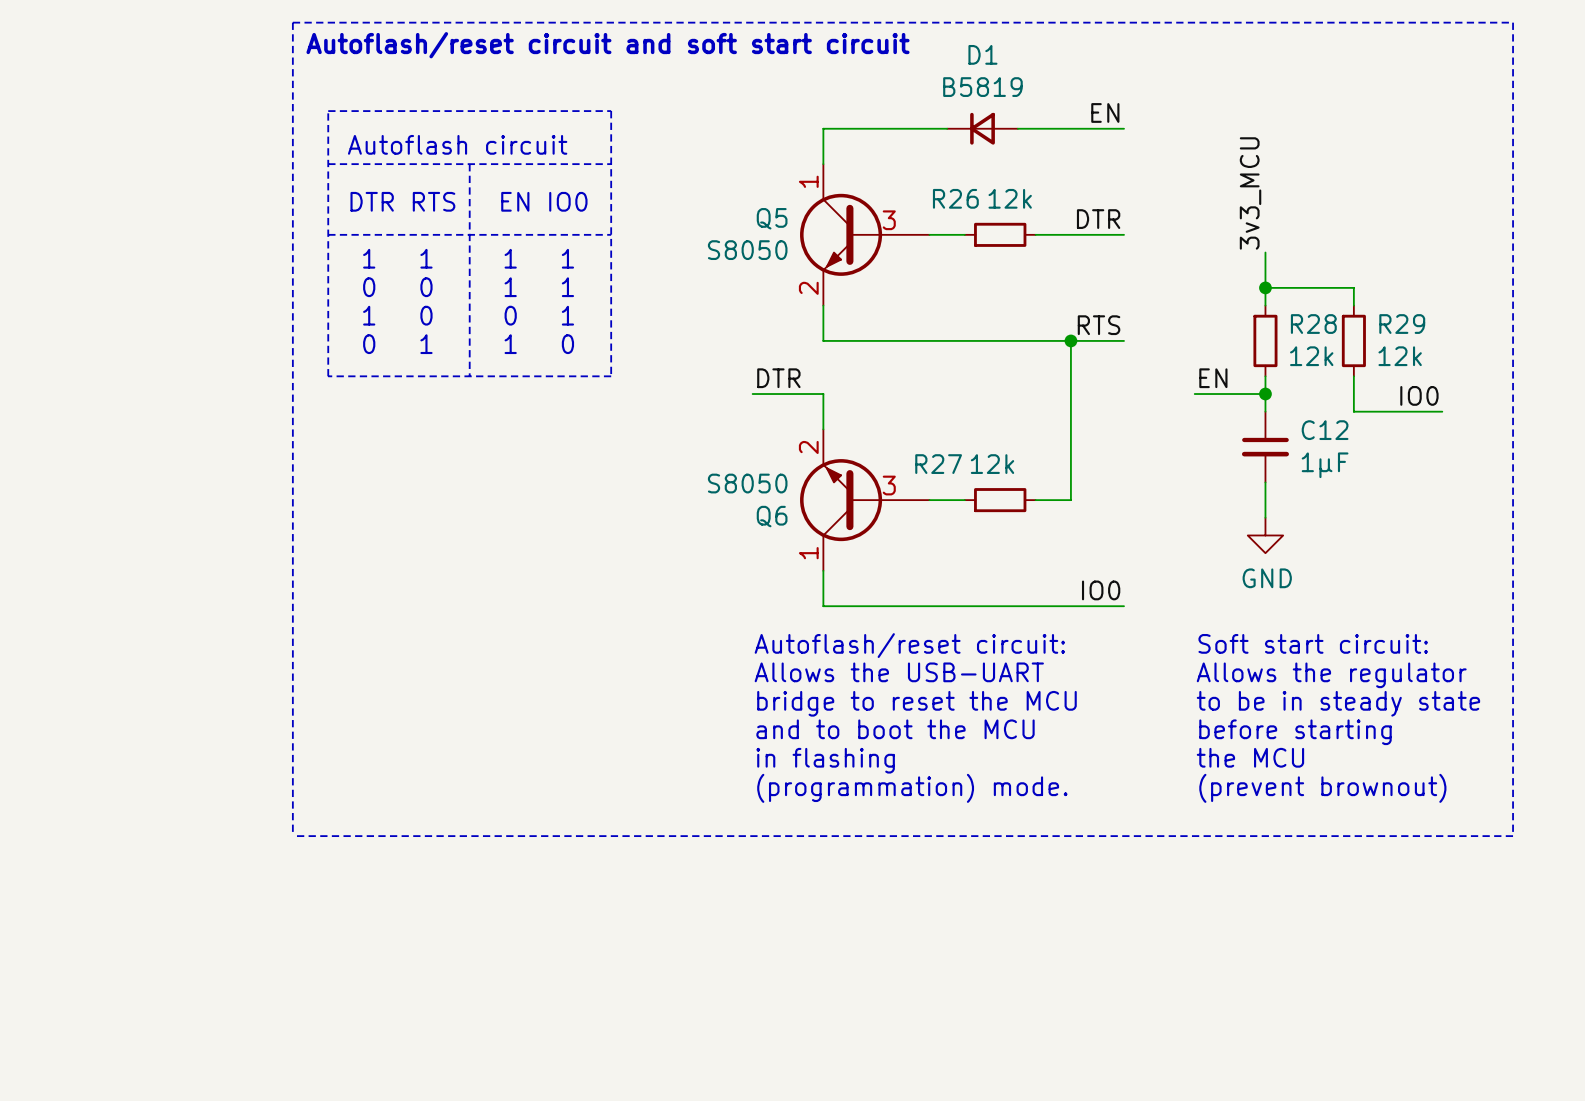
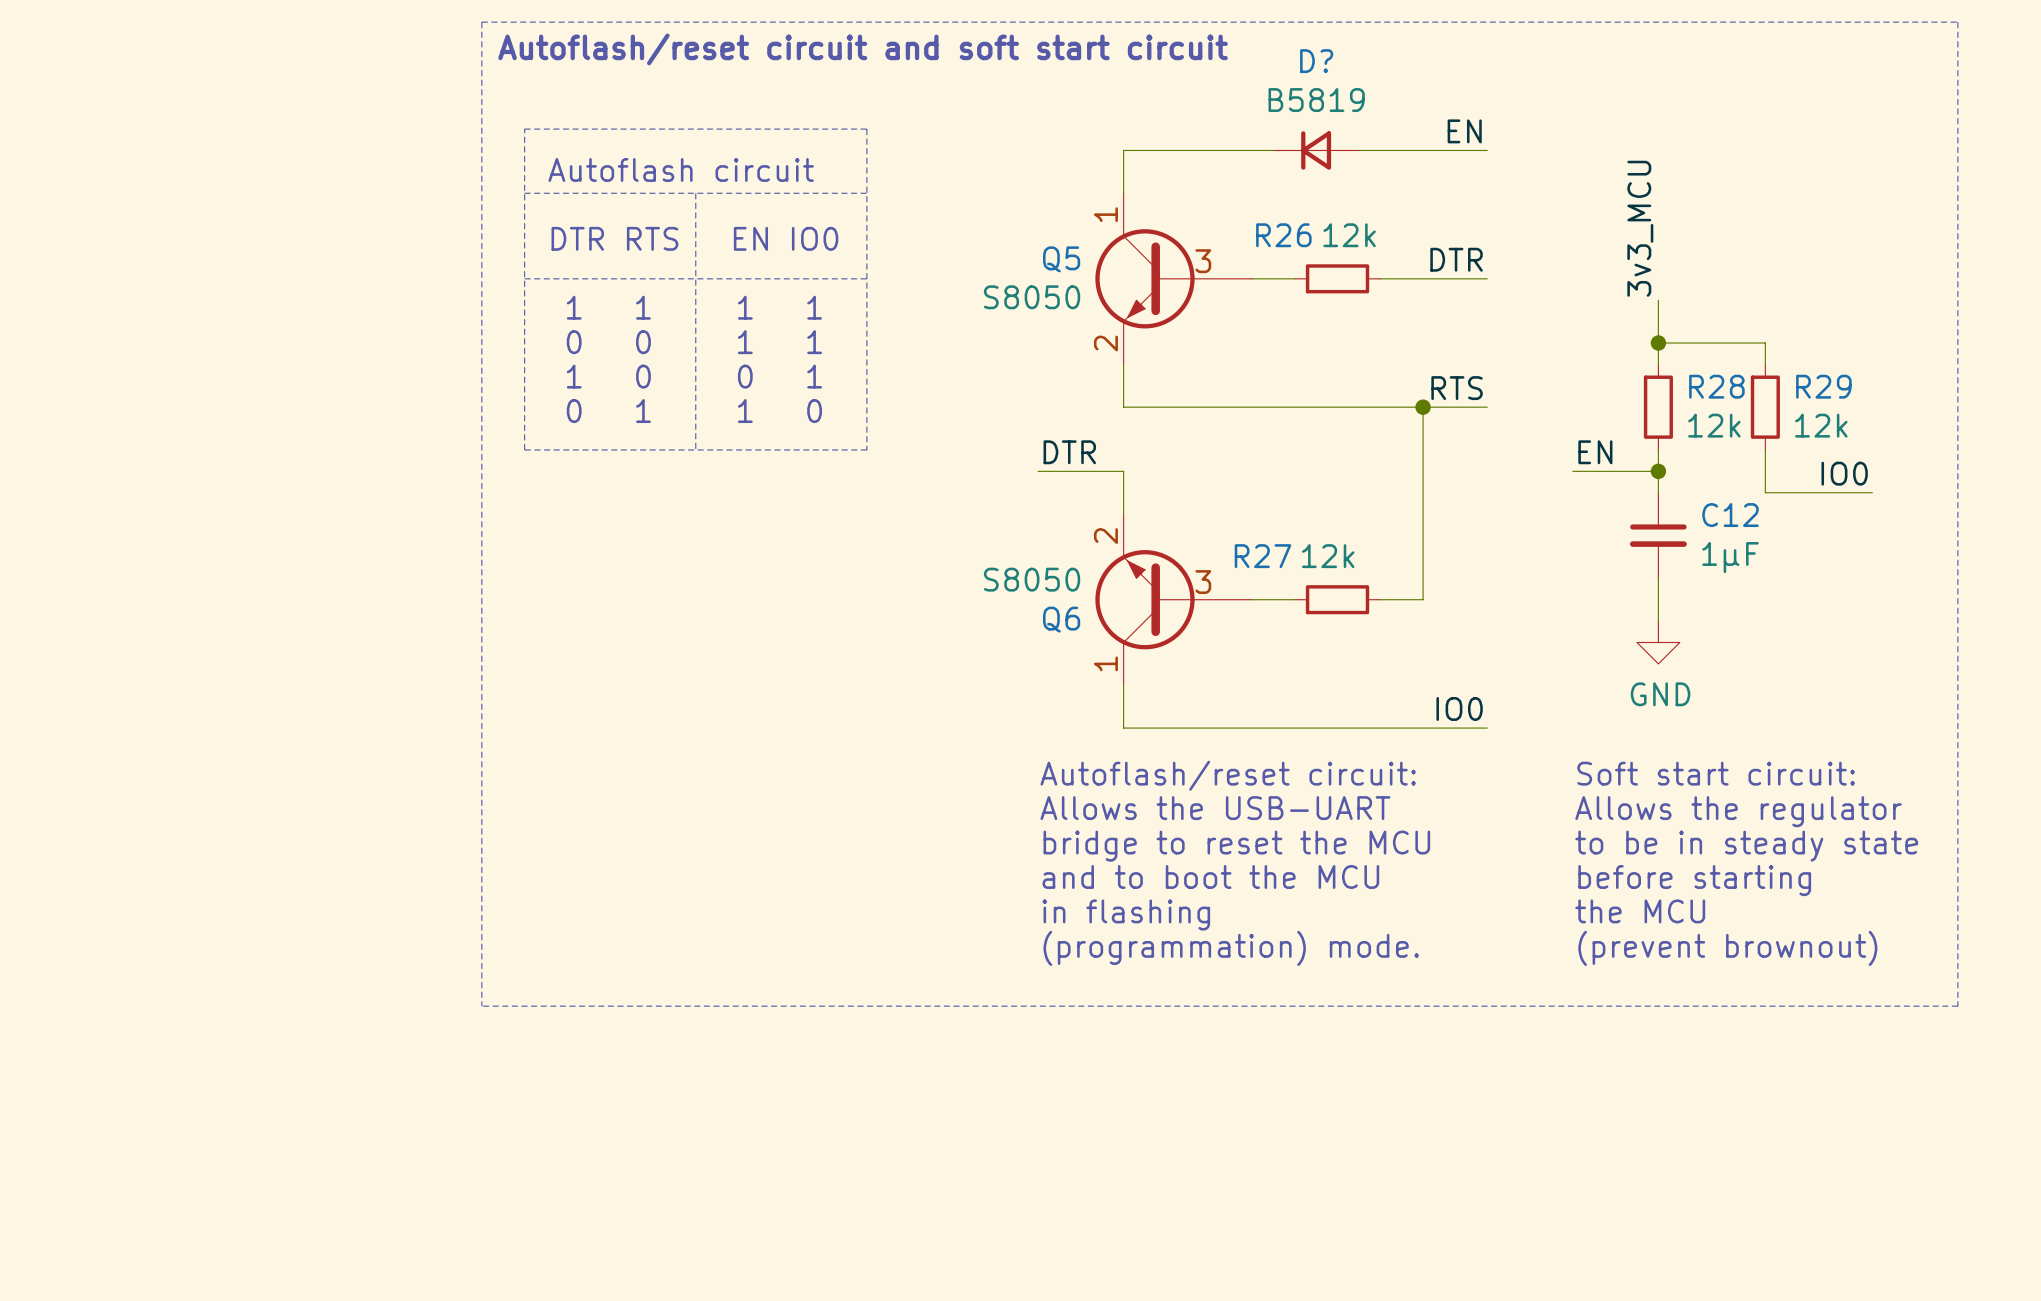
D1 name: D1 (982, 54) -> D? (1316, 61)

